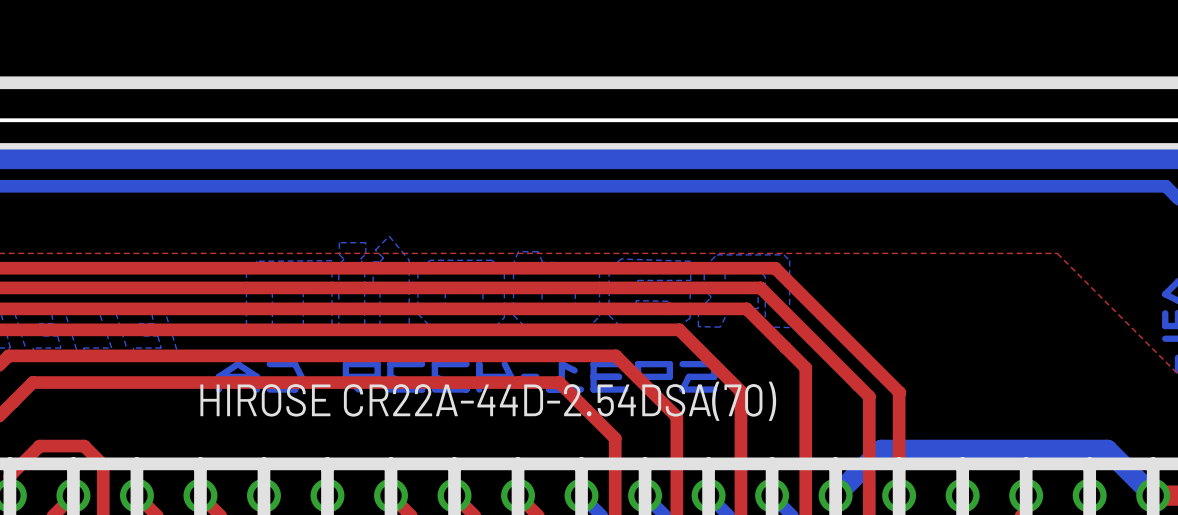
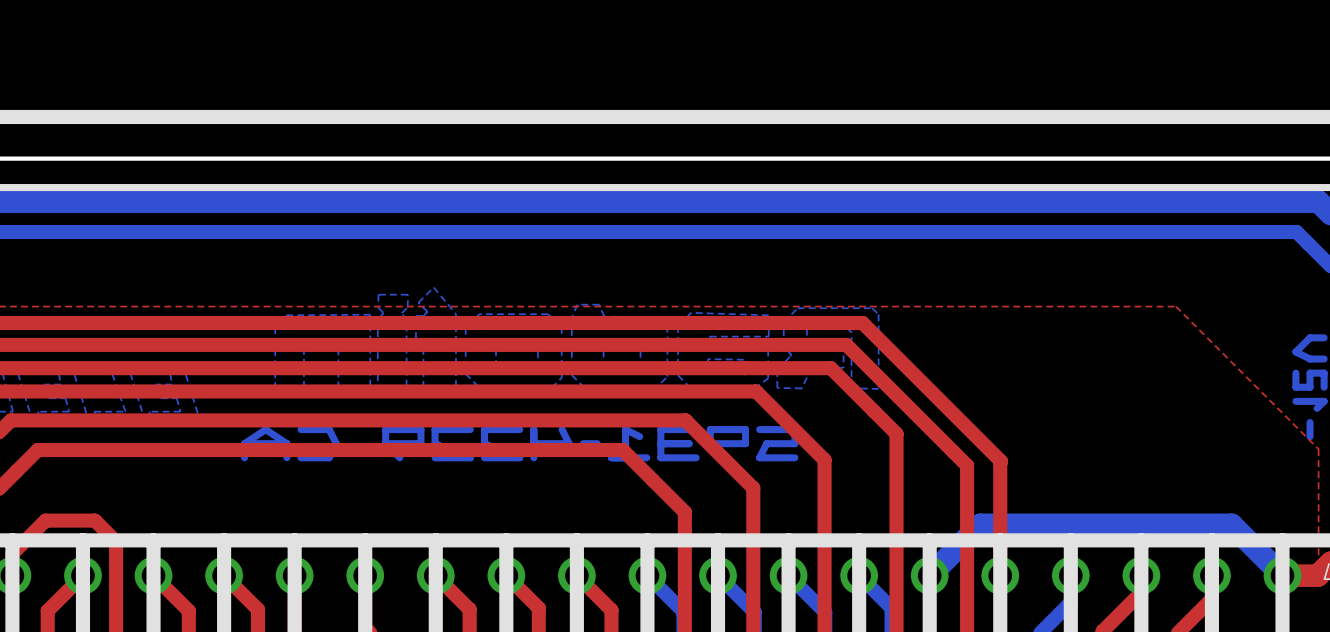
part text: HIROSE CR22A-44D-2.54DSA(70) (488, 401) -> none

